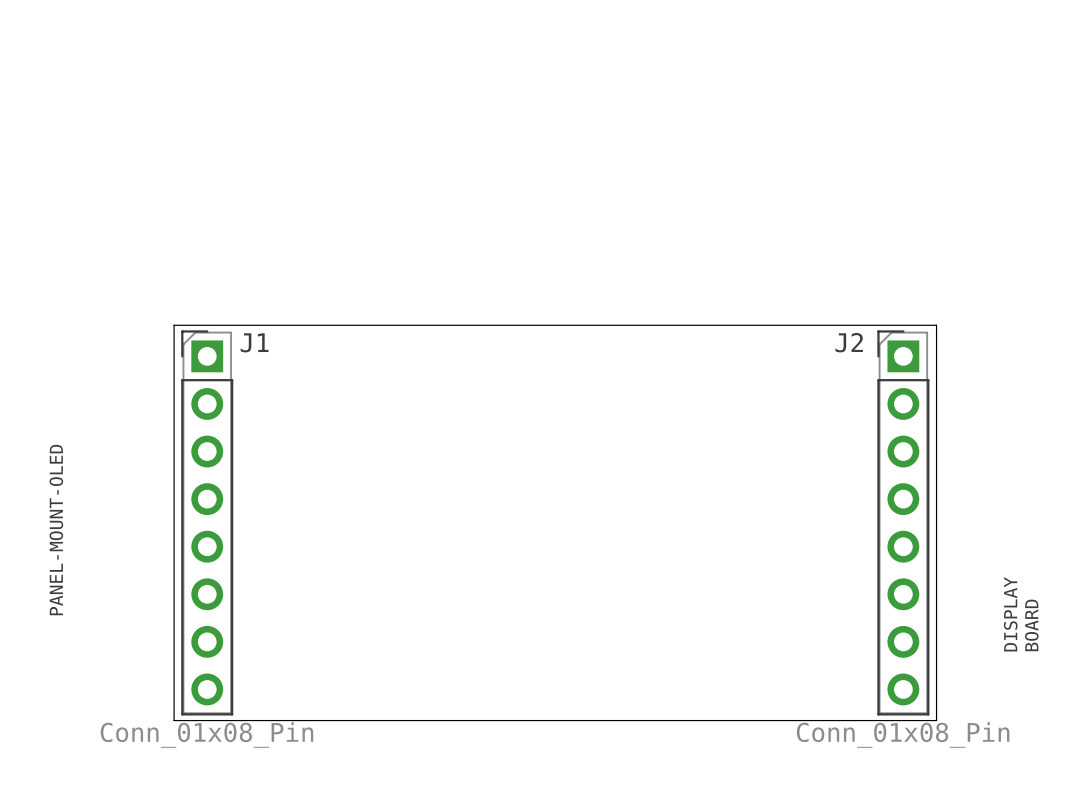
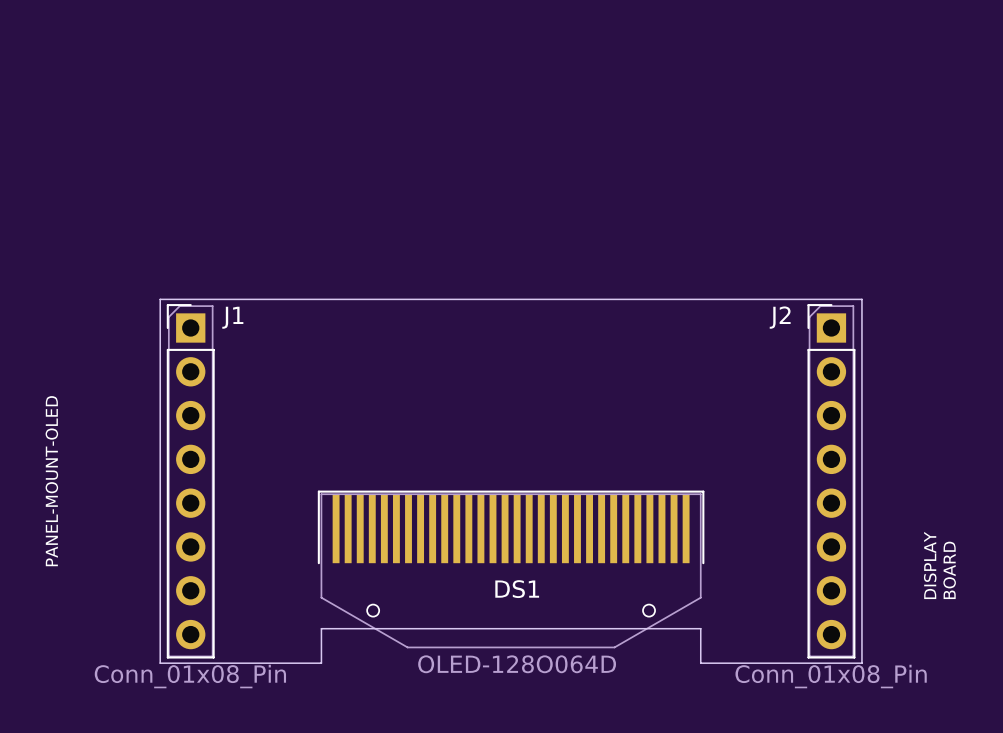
DS1: none -> OLED-128O064D (511, 569)
board edge: (349, 720) (761, 720) -> (321, 663) (321, 628) (700, 628) (700, 663)

